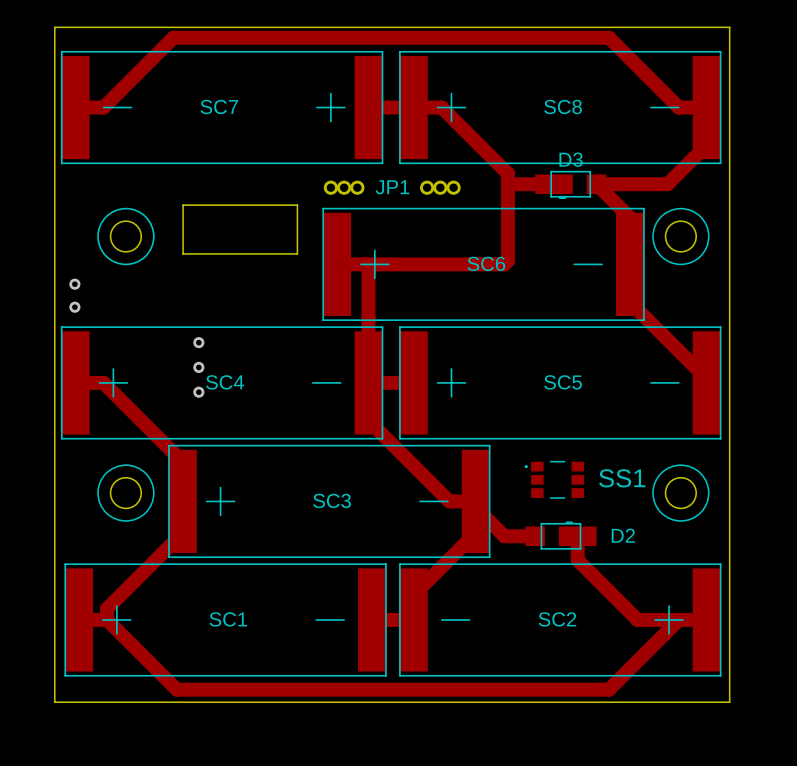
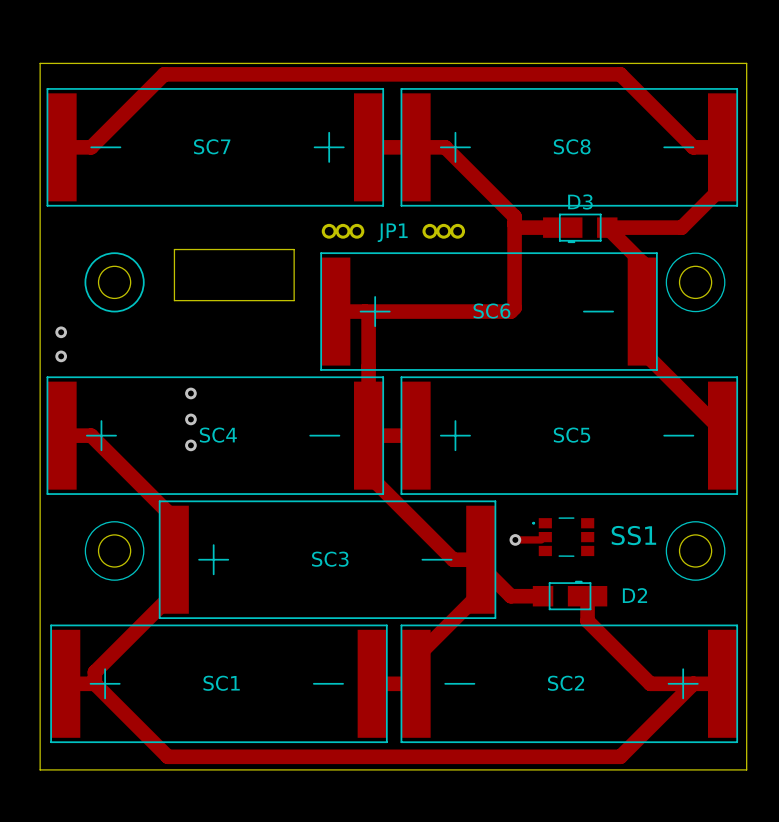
track: none -> (515, 539) (541, 539)
via: none -> (515, 539)

